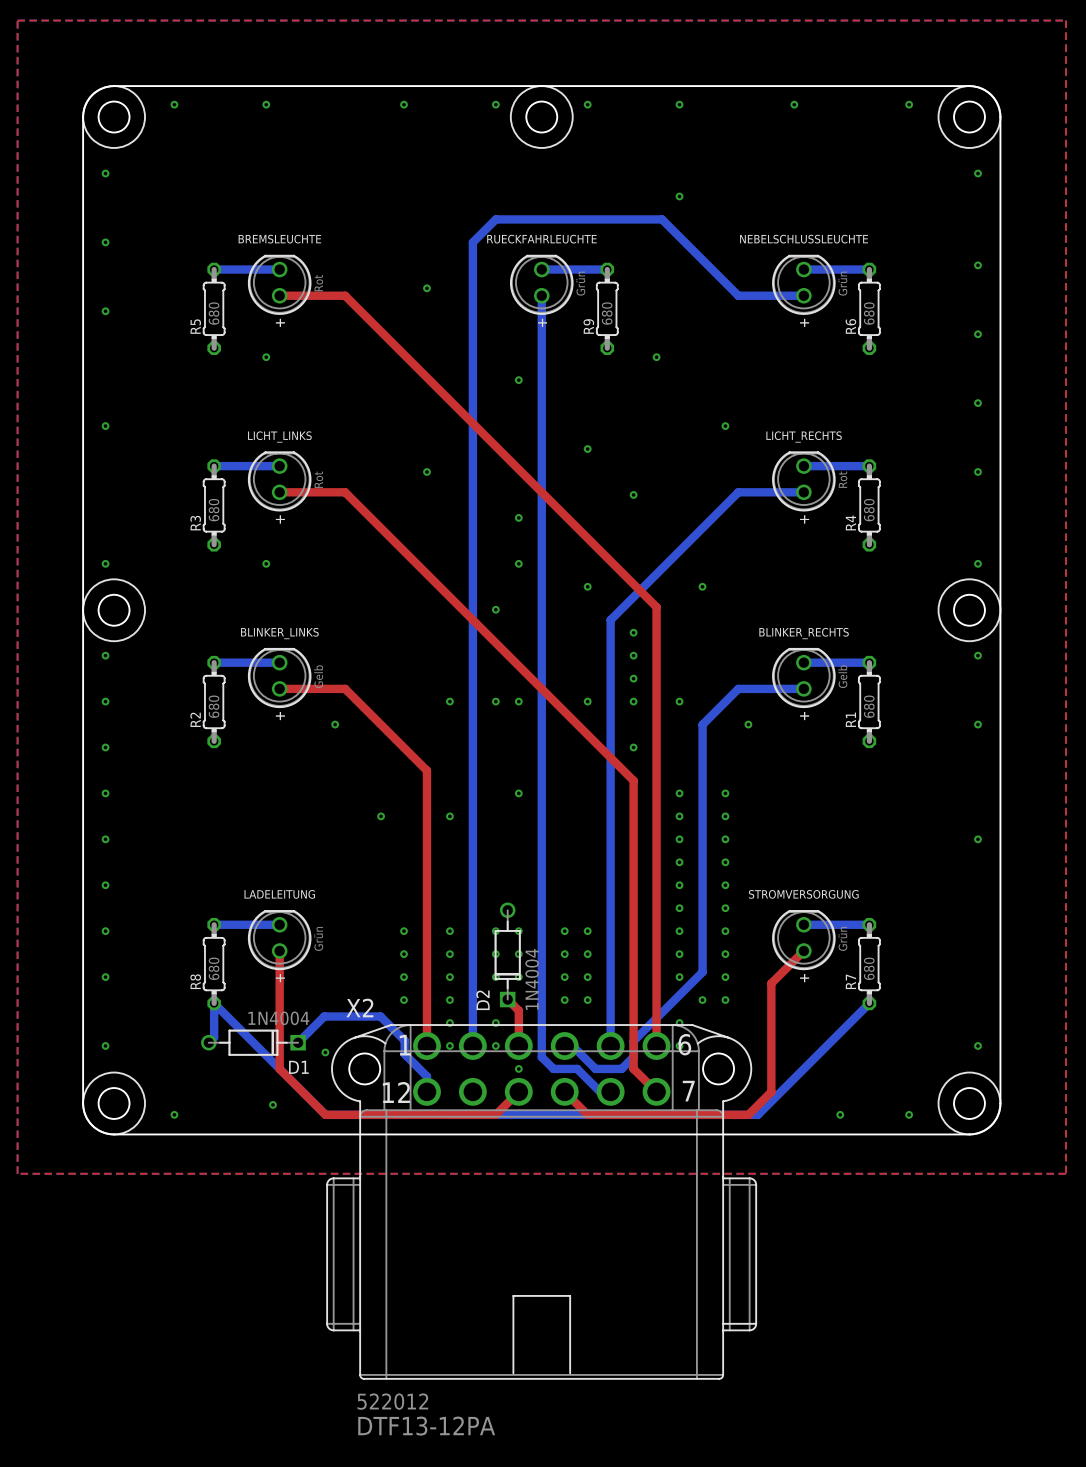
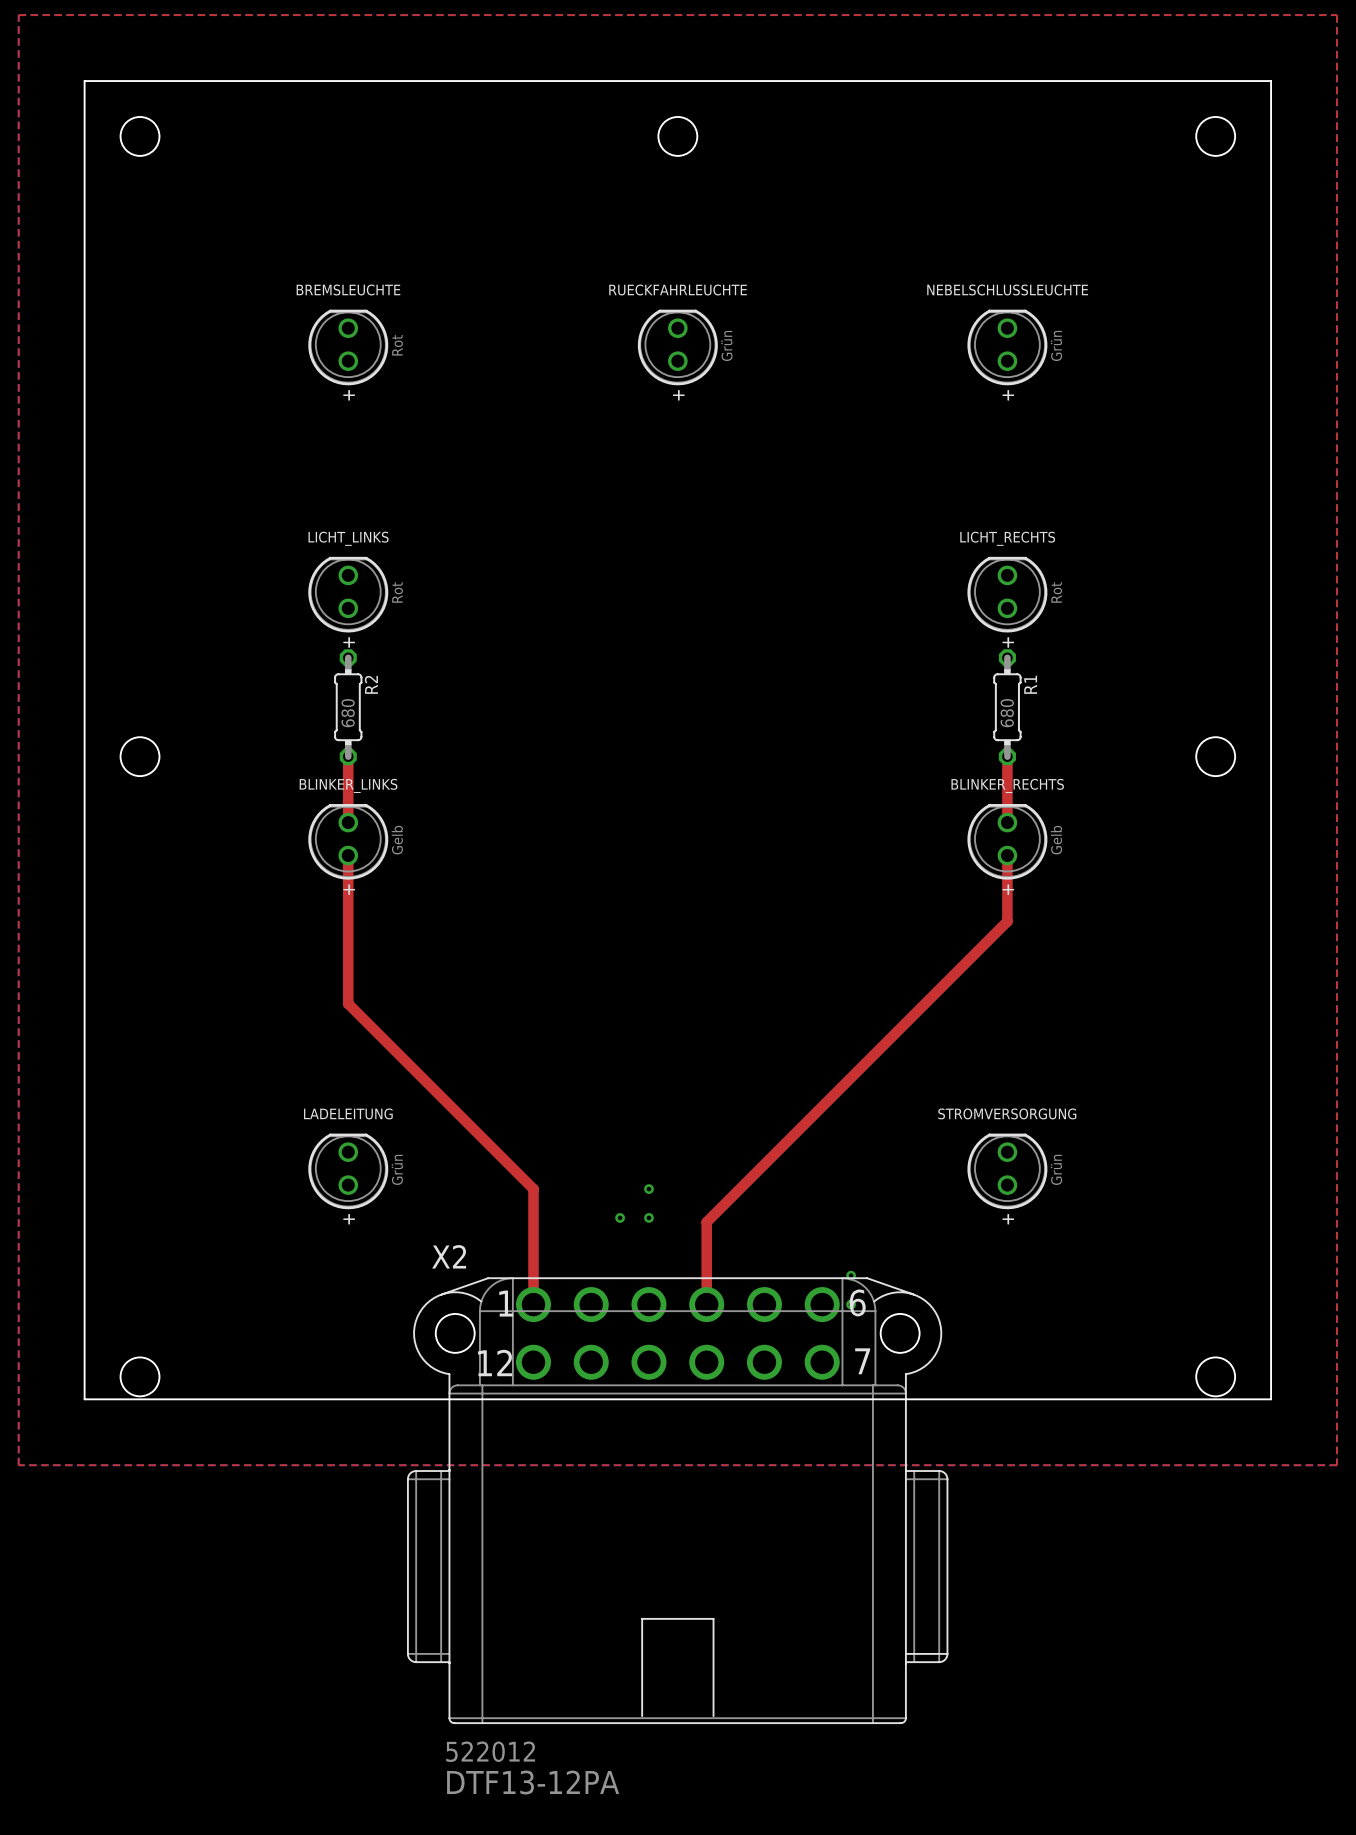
drawing: [82, 85, 146, 149] -> none
drawing: [510, 85, 574, 149] -> none
drawing: [937, 85, 1002, 149] -> none
board edge: (114, 86) (969, 86) (984, 90) (994, 98) (999, 109) (1000, 117) (1000, 1103) (996, 1118) (988, 1128) (977, 1133) (969, 1134) (114, 1134) (98, 1130) (89, 1122) (84, 1111) (83, 1103) (83, 117) (85, 105) (92, 95) (102, 88) (114, 86) -> (84, 81) (84, 1399) (1271, 1399) (1271, 81) (84, 81)
via: (174, 104) -> none
via: (266, 104) -> none
via: (404, 104) -> none
via: (495, 104) -> none
via: (587, 104) -> none
via: (679, 104) -> none
via: (794, 104) -> none
via: (909, 104) -> none
via: (105, 173) -> none
via: (977, 173) -> none
via: (679, 196) -> none
via: (105, 242) -> none
via: (977, 265) -> none
bottom track: (214, 269) (279, 269) -> none
bottom track: (541, 269) (607, 269) -> none
bottom track: (803, 269) (869, 269) -> none
via: (426, 288) -> none
top track: (279, 295) (345, 295) (656, 607) (656, 1045) -> none
bottom track: (541, 295) (541, 1057) (553, 1068) (577, 1068) (600, 1091) (610, 1091) -> none
bottom track: (803, 295) (738, 295) (662, 219) (495, 219) (472, 242) (472, 1045) -> none
R5: 680 (214, 308) -> none
R9: 680 (607, 308) -> none
R6: 680 (869, 308) -> none
via: (105, 311) -> none
via: (977, 334) -> none
via: (266, 357) -> none
via: (656, 357) -> none
via: (518, 380) -> none
via: (977, 403) -> none
via: (105, 426) -> none
via: (725, 426) -> none
via: (587, 449) -> none
bottom track: (214, 466) (279, 466) -> none
bottom track: (803, 466) (869, 466) -> none
via: (426, 471) -> none
via: (977, 471) -> none
top track: (279, 492) (345, 492) (633, 780) (633, 1068) (656, 1091) -> none
bottom track: (803, 492) (738, 492) (610, 620) (610, 1045) -> none
via: (633, 494) -> none
R3: 680 (214, 505) -> none
R4: 680 (869, 505) -> none
via: (518, 517) -> none
via: (105, 563) -> none
via: (266, 563) -> none
via: (518, 563) -> none
via: (977, 563) -> none
drawing: [82, 578, 146, 643] -> none
drawing: [937, 578, 1002, 643] -> none
via: (587, 586) -> none
via: (702, 586) -> none
via: (495, 609) -> none
top track: none -> (348, 756) (348, 822)
top track: none -> (1007, 756) (1007, 822)
via: (633, 632) -> none
via: (105, 655) -> none
via: (633, 655) -> none
via: (977, 655) -> none
bottom track: (214, 662) (279, 662) -> none
bottom track: (803, 662) (869, 662) -> none
via: (633, 678) -> none
top track: (279, 688) (345, 688) (426, 770) (426, 954) -> (348, 855) (348, 1003) (533, 1189)
top track: none -> (1007, 855) (1007, 921) (706, 1222) (706, 1304)
bottom track: (803, 688) (738, 688) (702, 724) (702, 972) (633, 1041) (633, 1057) (621, 1068) (595, 1068) (572, 1045) (564, 1045) -> none
via: (105, 701) -> none
R2 position: (214, 701) -> (348, 707)
via: (449, 701) -> none
via: (495, 701) -> none
via: (518, 701) -> none
via: (587, 701) -> none
via: (633, 701) -> none
via: (679, 701) -> none
R1 position: (869, 701) -> (1007, 707)
R2 name position: R2 (195, 719) -> R2 (371, 684)
R1 name position: R1 (850, 719) -> R1 (1030, 684)
via: (335, 724) -> none
via: (748, 724) -> none
via: (977, 724) -> none
via: (105, 747) -> none
via: (633, 747) -> none
via: (105, 793) -> none
via: (518, 793) -> none
via: (679, 793) -> none
via: (725, 793) -> none
via: (381, 816) -> none
via: (449, 816) -> none
via: (679, 816) -> none
via: (725, 816) -> none
via: (105, 839) -> none
via: (679, 839) -> none
via: (725, 839) -> none
via: (977, 839) -> none
via: (679, 862) -> none
via: (725, 862) -> none
via: (105, 885) -> none
via: (679, 885) -> none
via: (725, 885) -> none
via: (679, 908) -> none
via: (725, 908) -> none
bottom track: (214, 924) (279, 924) -> none
bottom track: (803, 924) (869, 924) -> none
via: (105, 931) -> none
via: (404, 931) -> none
via: (449, 931) -> none
via: (495, 931) -> none
via: (518, 931) -> none
via: (564, 931) -> none
via: (587, 931) -> none
via: (679, 931) -> none
via: (725, 931) -> none
top track: (279, 950) (279, 1069) (325, 1114) (495, 1114) (518, 1091) -> none
top track: (803, 950) (771, 983) (771, 1091) (748, 1114) (587, 1114) (564, 1091) -> none
via: (404, 954) -> none
via: (449, 954) -> none
via: (495, 954) -> none
D2: 1N4004 (507, 954) -> none
via: (564, 954) -> none
via: (587, 954) -> none
via: (679, 954) -> none
via: (725, 954) -> none
R8: 680 (214, 964) -> none
R7: 680 (869, 964) -> none
via: (105, 977) -> none
via: (404, 977) -> none
via: (449, 977) -> none
via: (564, 977) -> none
via: (587, 977) -> none
via: (679, 977) -> none
via: (725, 977) -> none
top track: (507, 999) (518, 1010) (518, 1045) -> none
via: (404, 1000) -> none
via: (449, 1000) -> none
via: (564, 1000) -> none
via: (587, 1000) -> none
via: (702, 1000) -> none
via: (725, 1000) -> none
bottom track: (869, 1003) (757, 1114) (325, 1114) (214, 1003) (214, 1037) (208, 1042) -> none
via: (449, 1023) -> none
via: (495, 1023) -> none
D1: 1N4004 (253, 1042) -> none
bottom track: (298, 1042) (324, 1016) (380, 1016) (404, 1040) (404, 1054) (426, 1076) (426, 1091) -> none
via: (105, 1045) -> none
via: (449, 1045) -> none
via: (495, 1045) -> none
via: (977, 1045) -> none
via: (325, 1052) -> none
via: (518, 1068) -> none
drawing: [82, 1071, 146, 1136] -> none
drawing: [937, 1071, 1002, 1136] -> none
via: (272, 1104) -> none
via: (174, 1114) -> none
via: (840, 1114) -> none
via: (909, 1114) -> none

